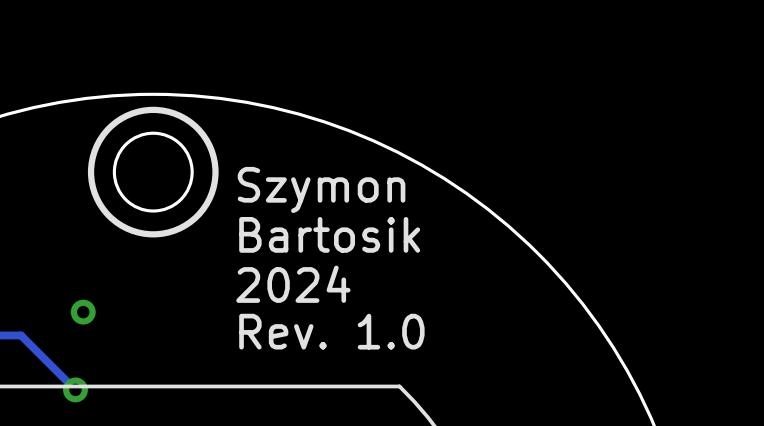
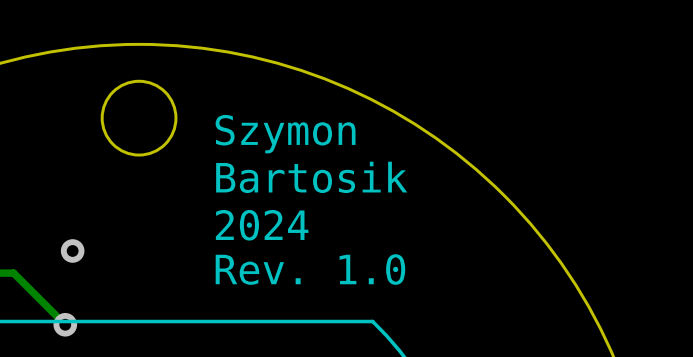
drawing: [87, 106, 219, 238] -> none

